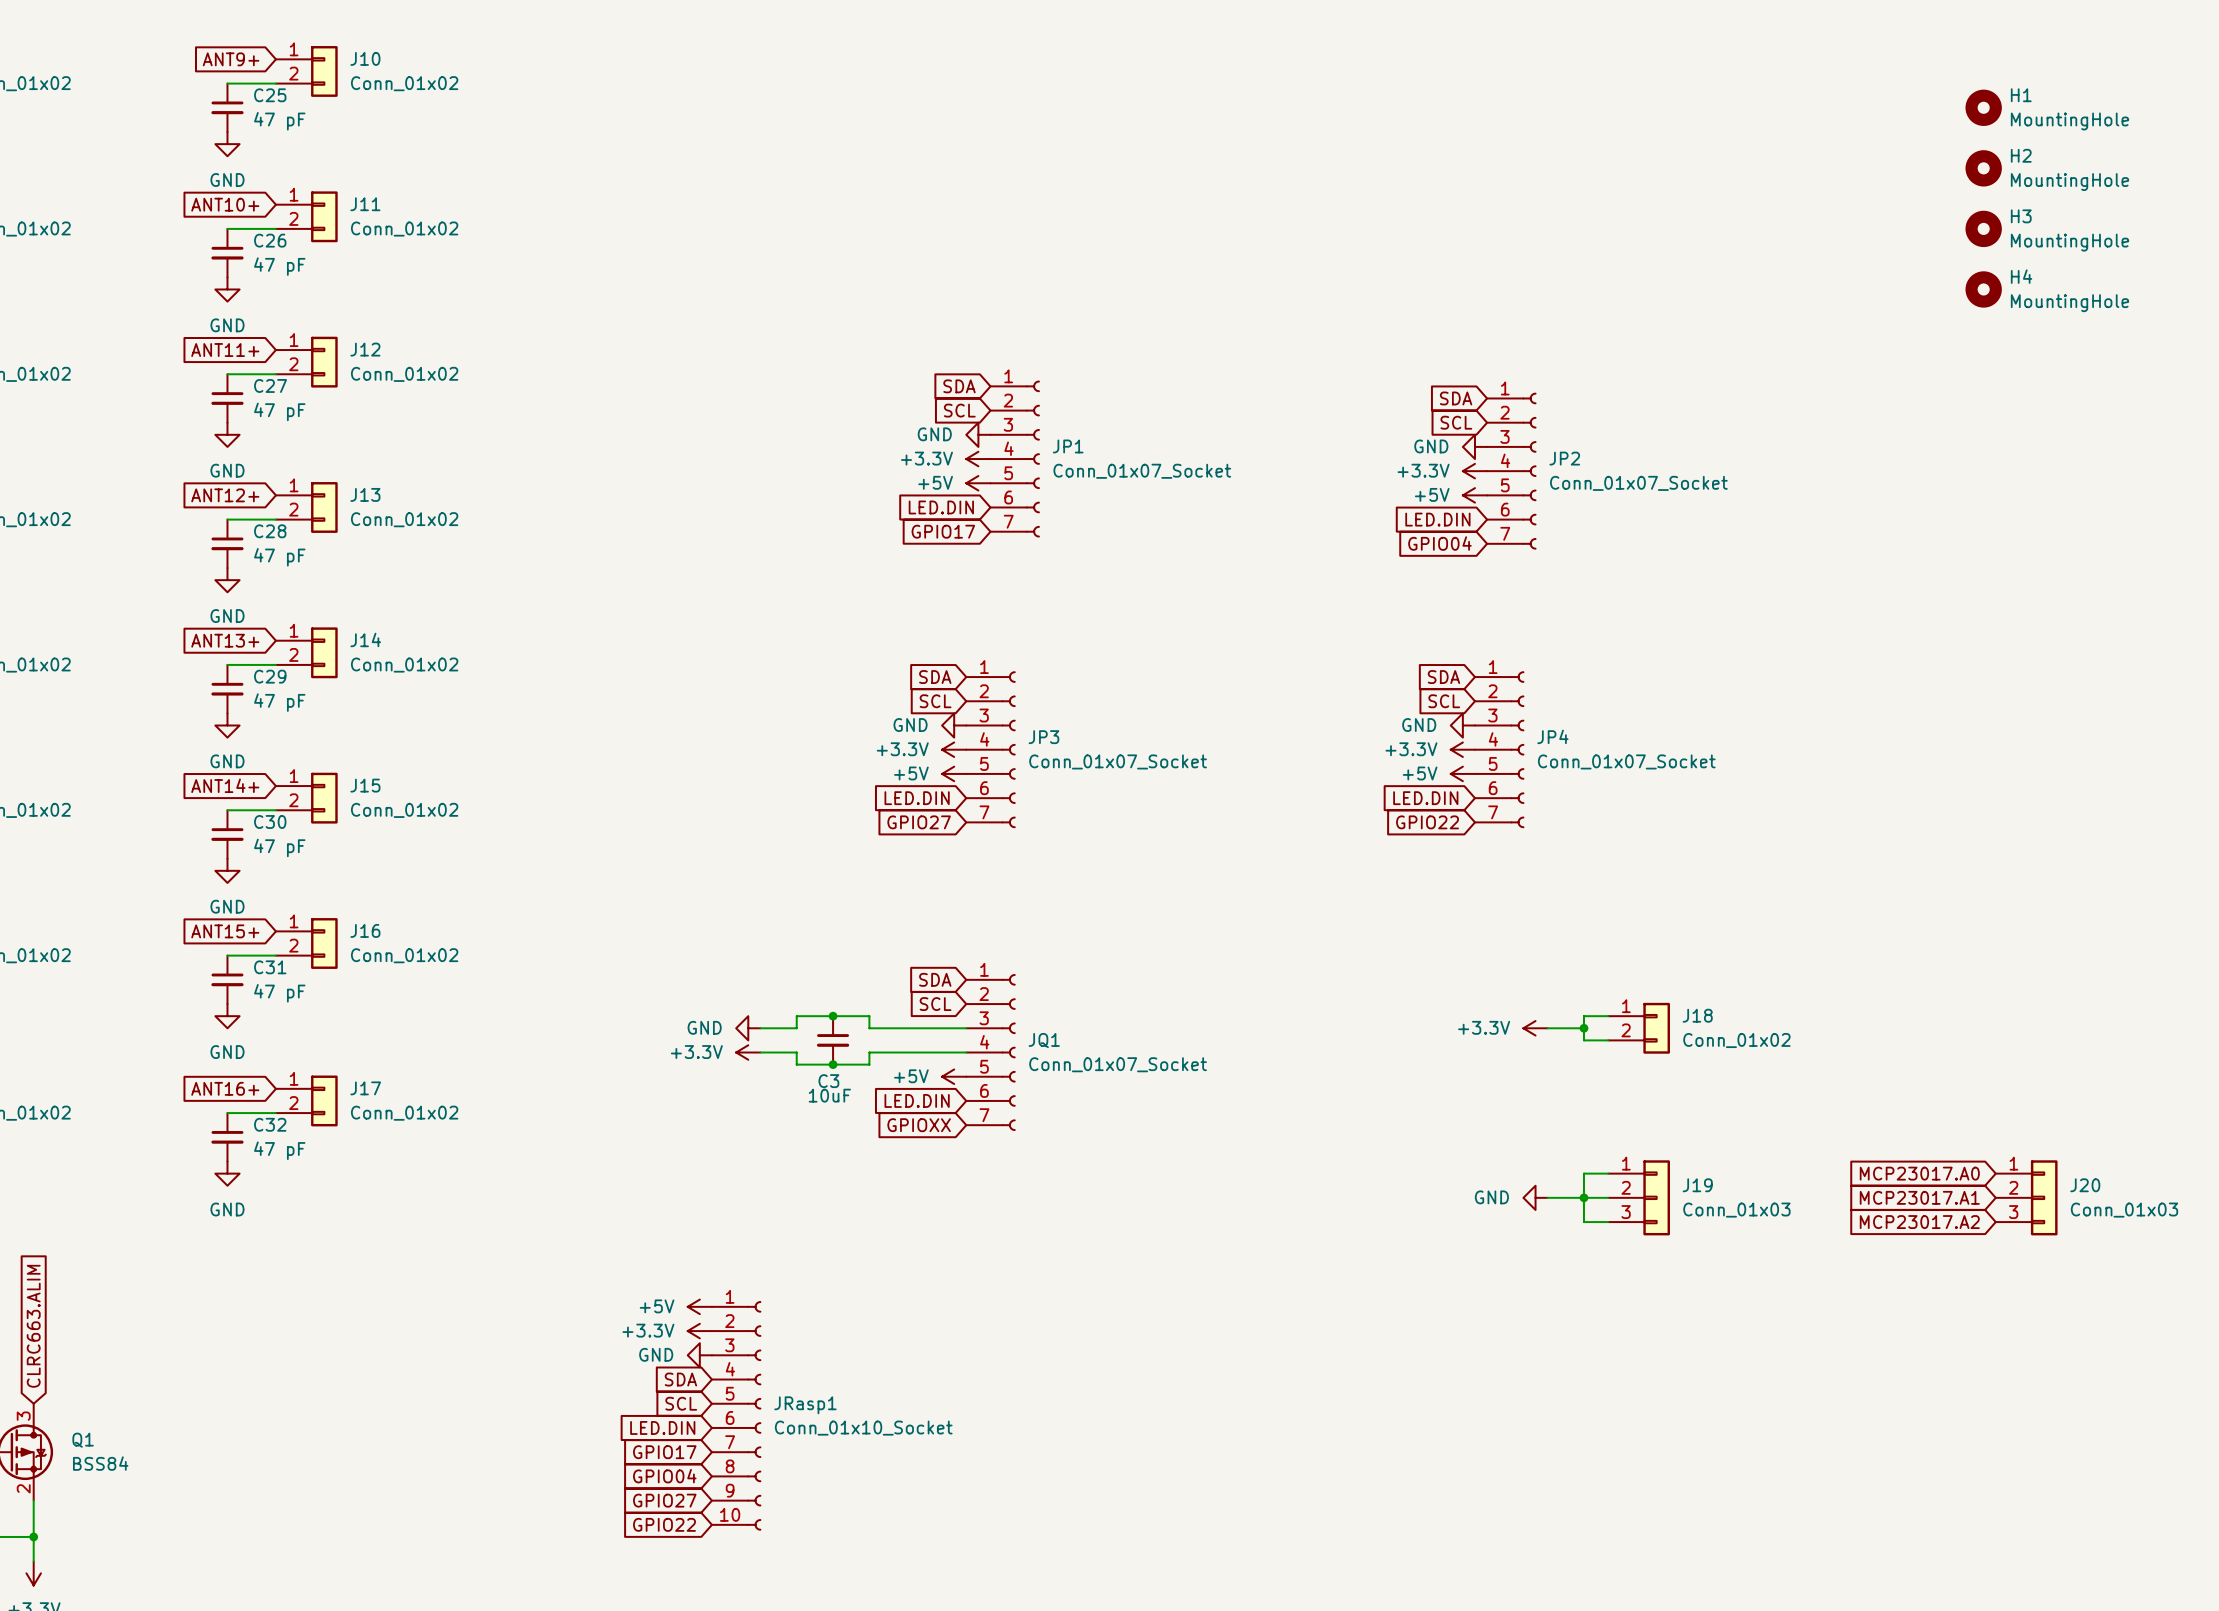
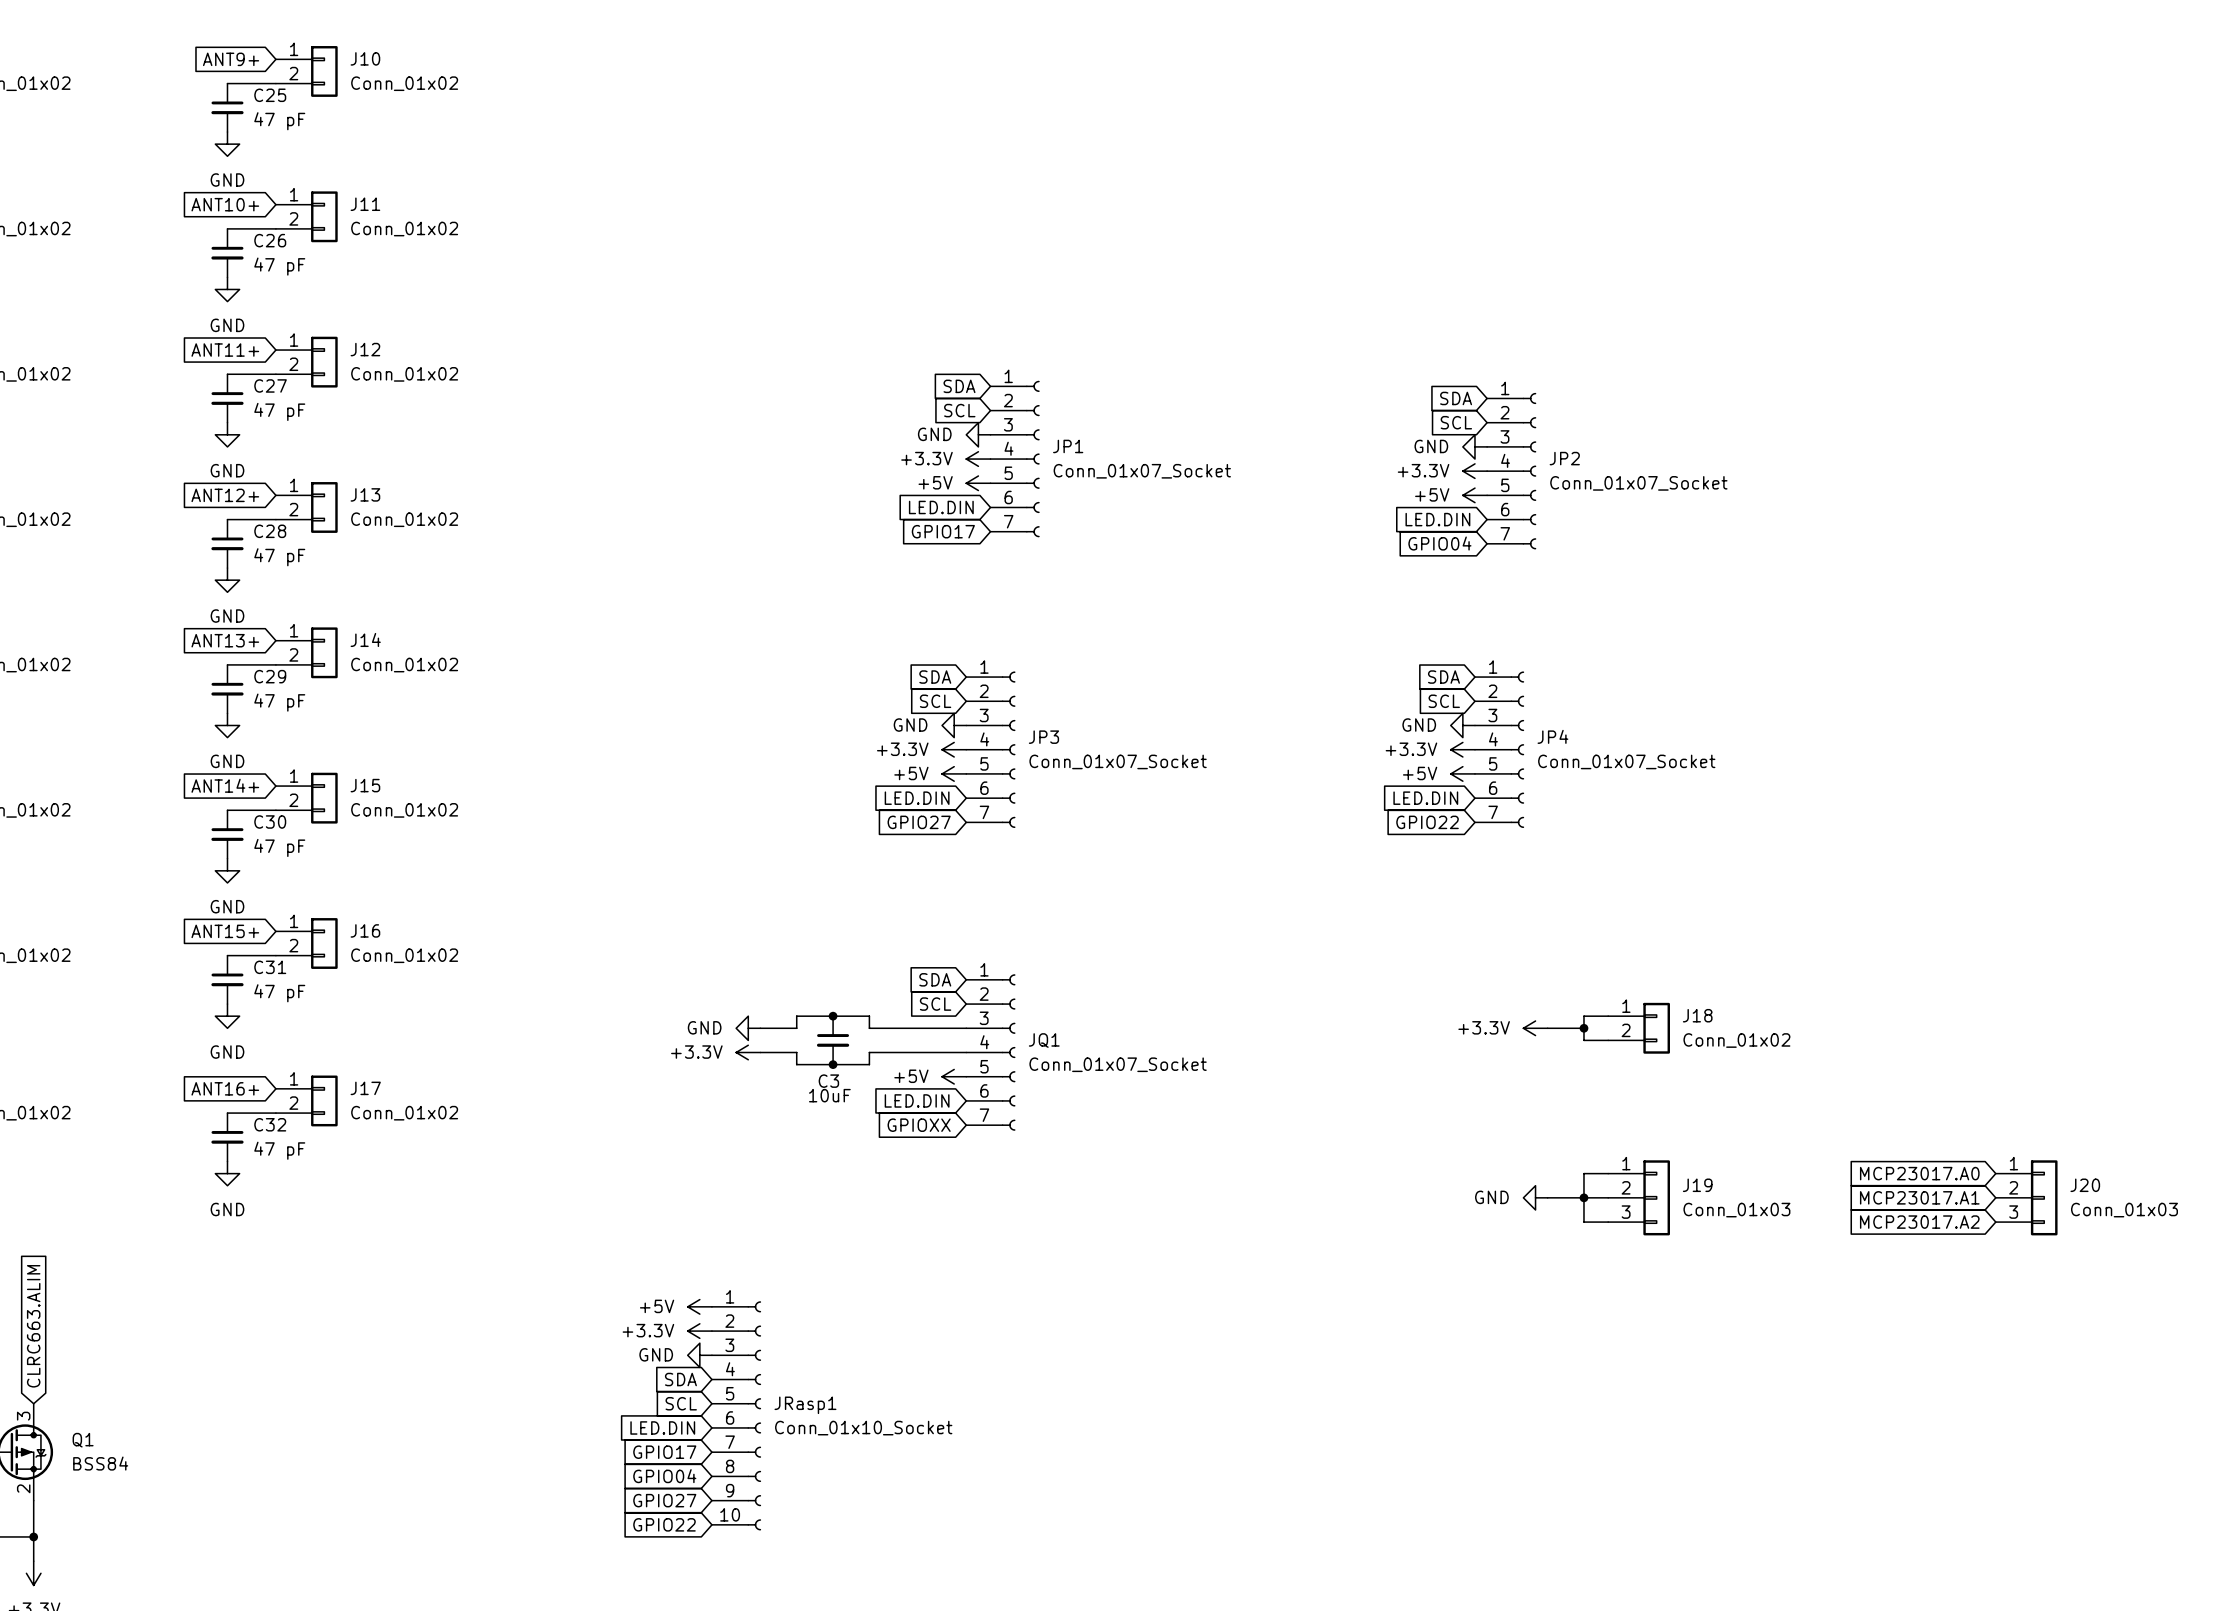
H1: MountingHole (1983, 107) -> none
H2: MountingHole (1983, 168) -> none
H3: MountingHole (1983, 228) -> none
H4: MountingHole (1983, 289) -> none

